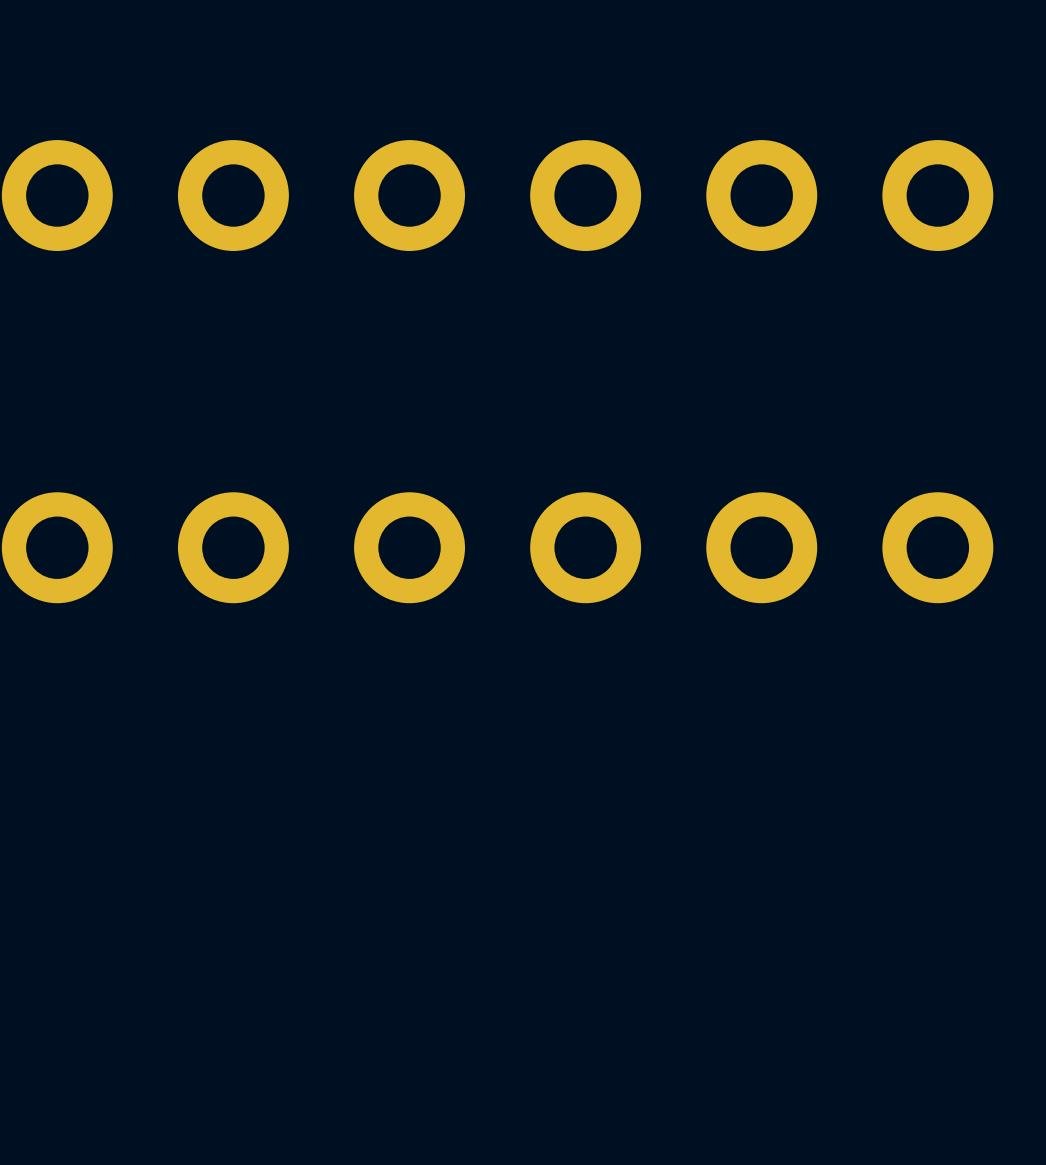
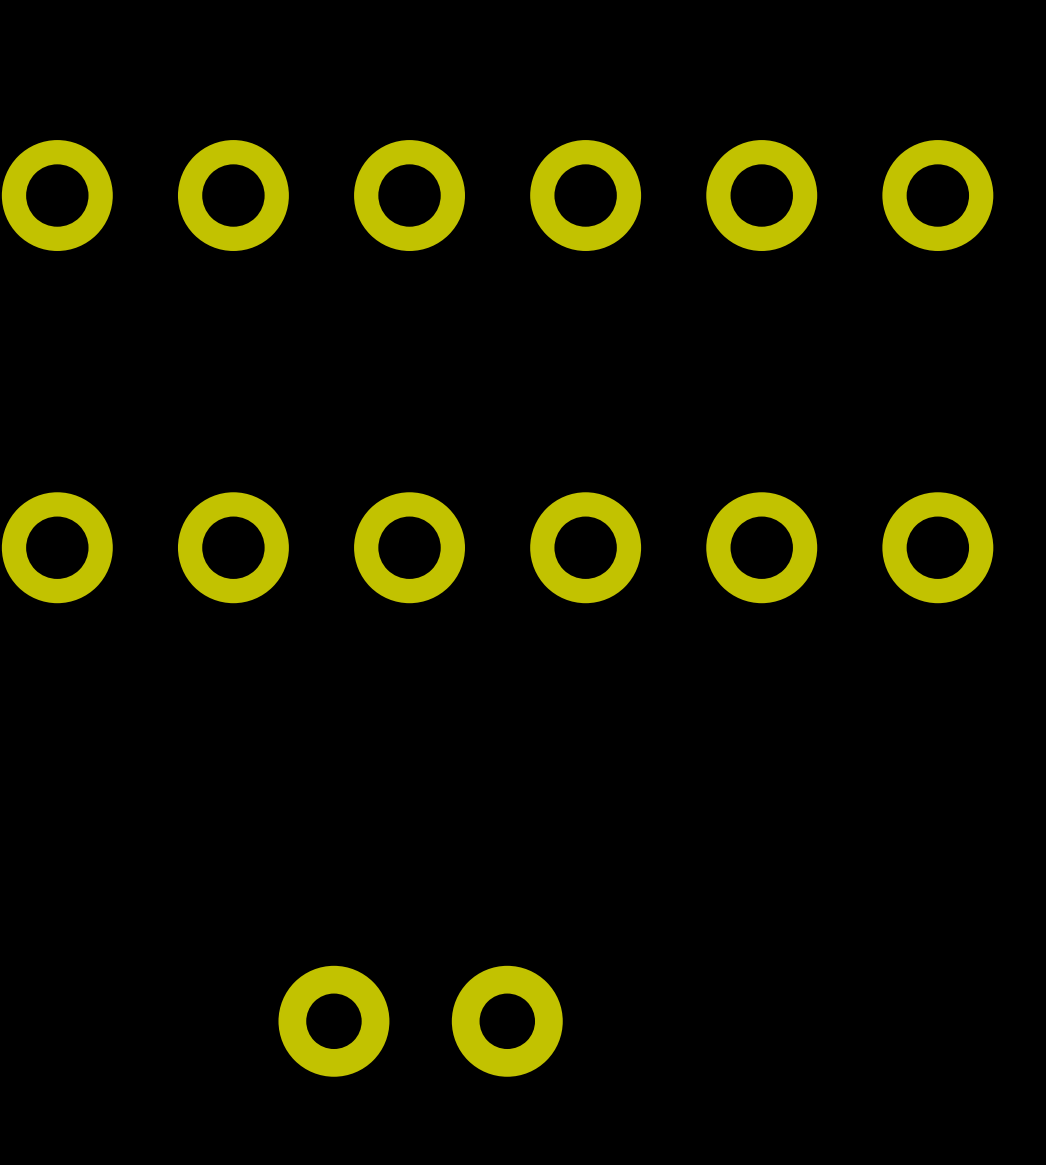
part: none -> (420, 1021)

